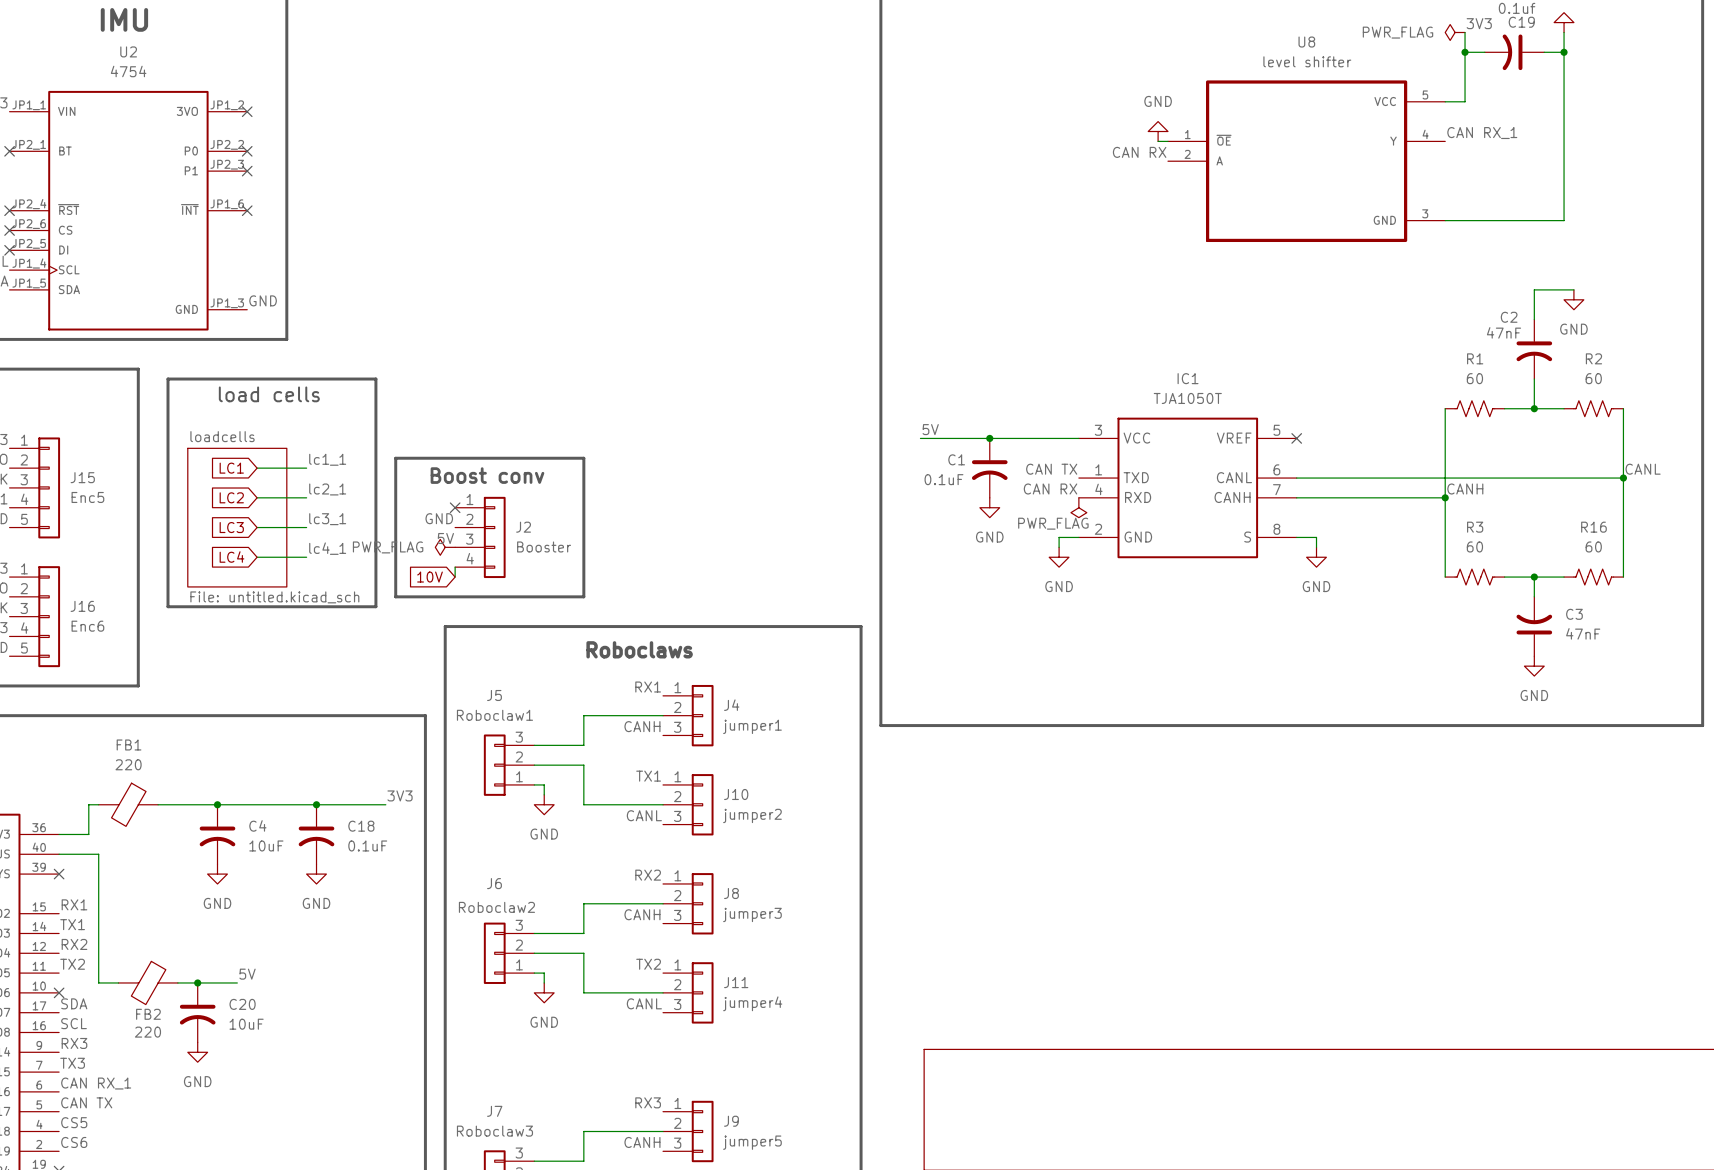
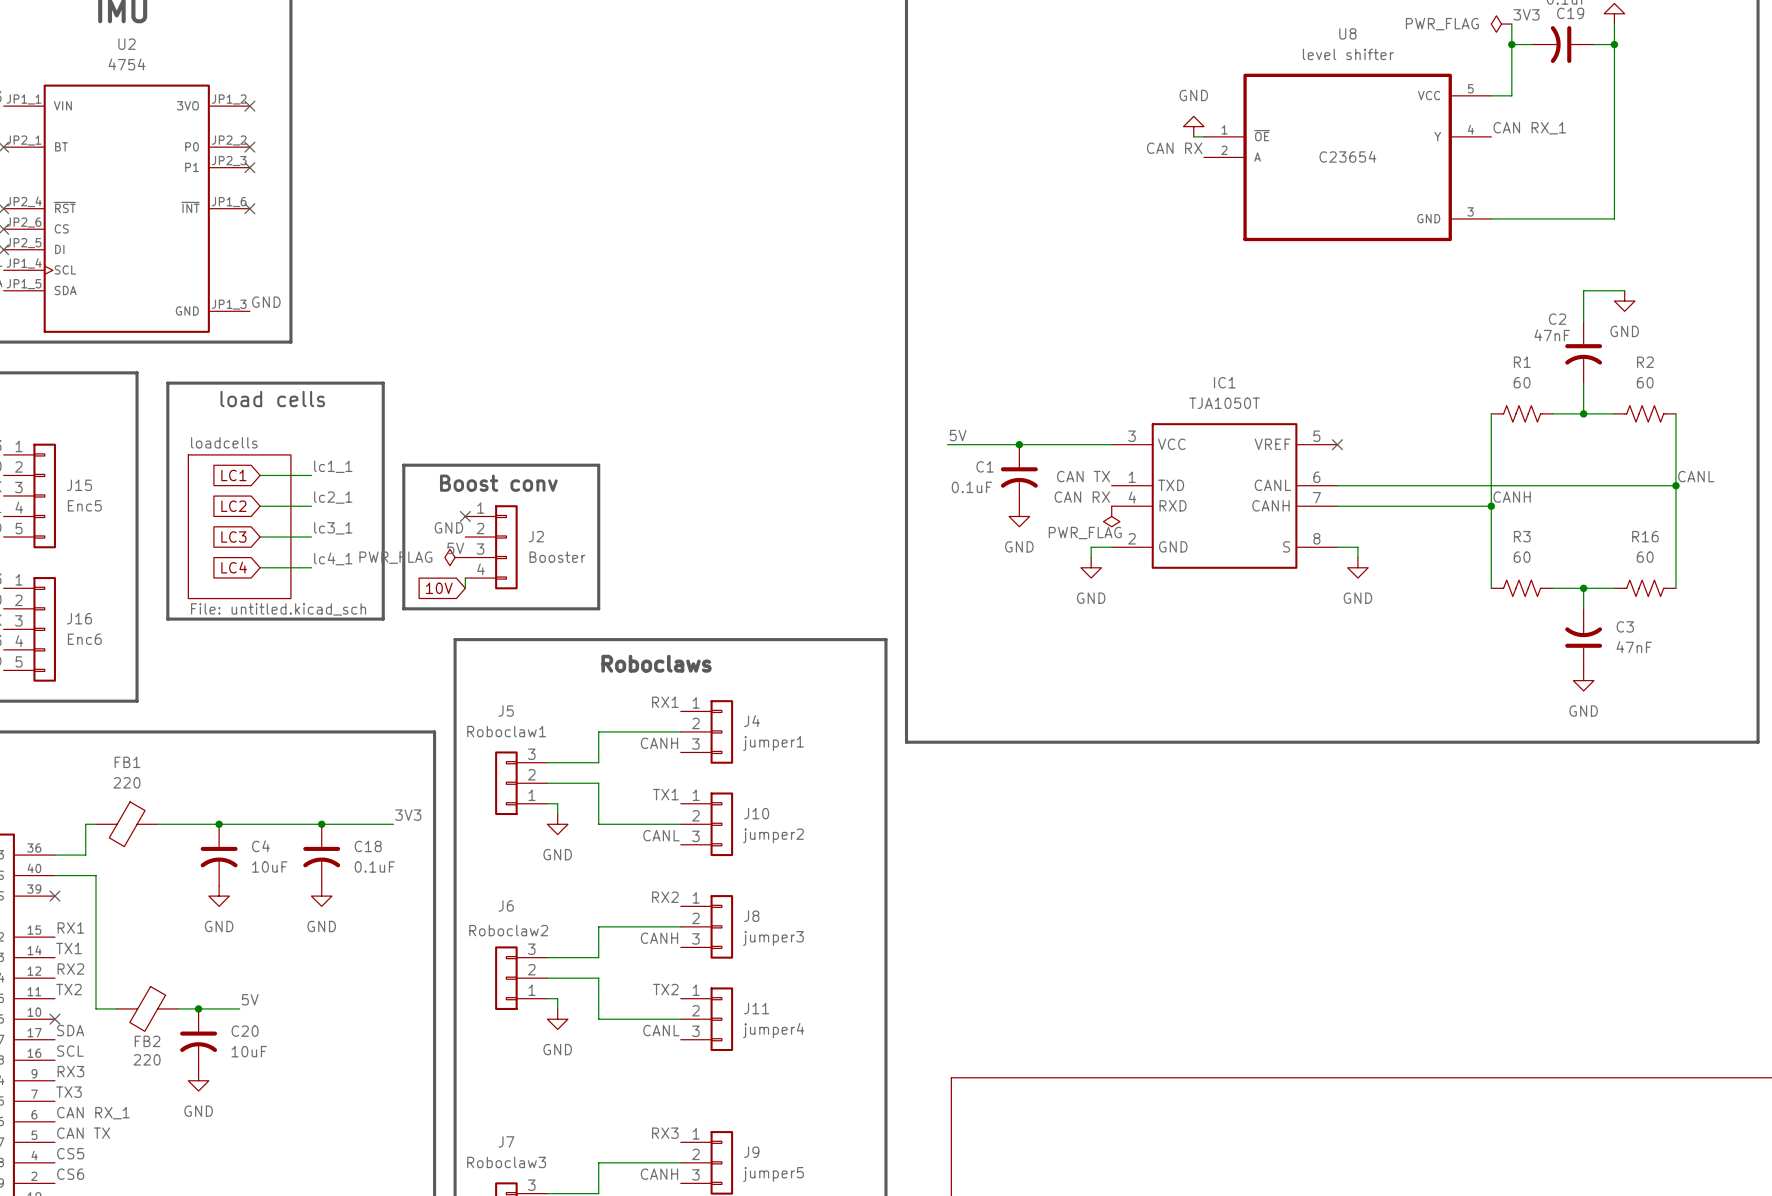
U8 text: none -> C23654 (1347, 156)

